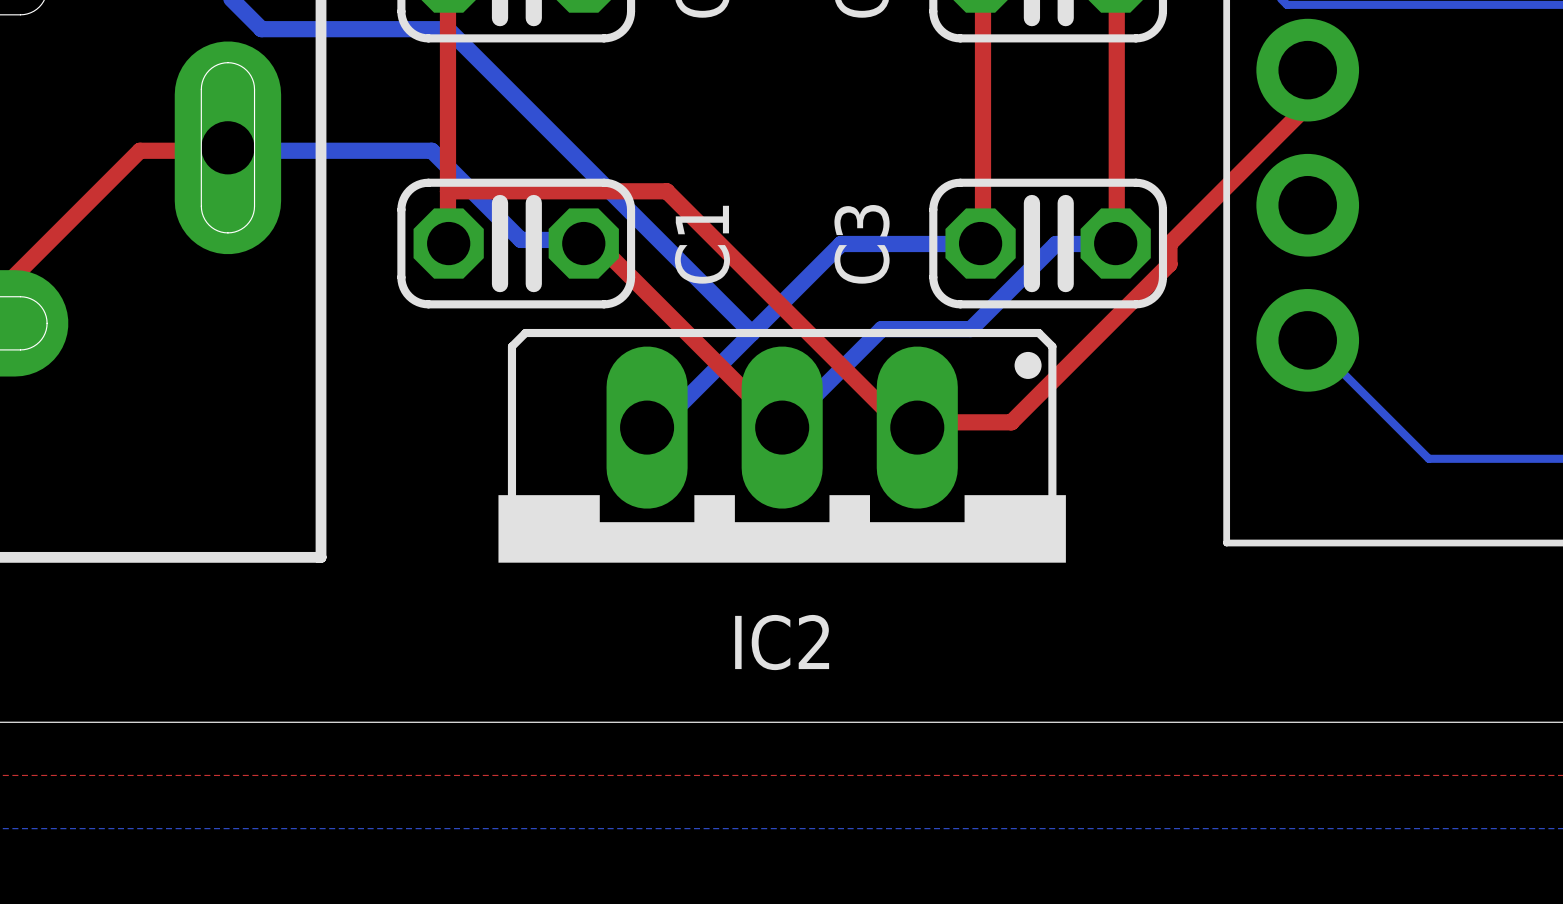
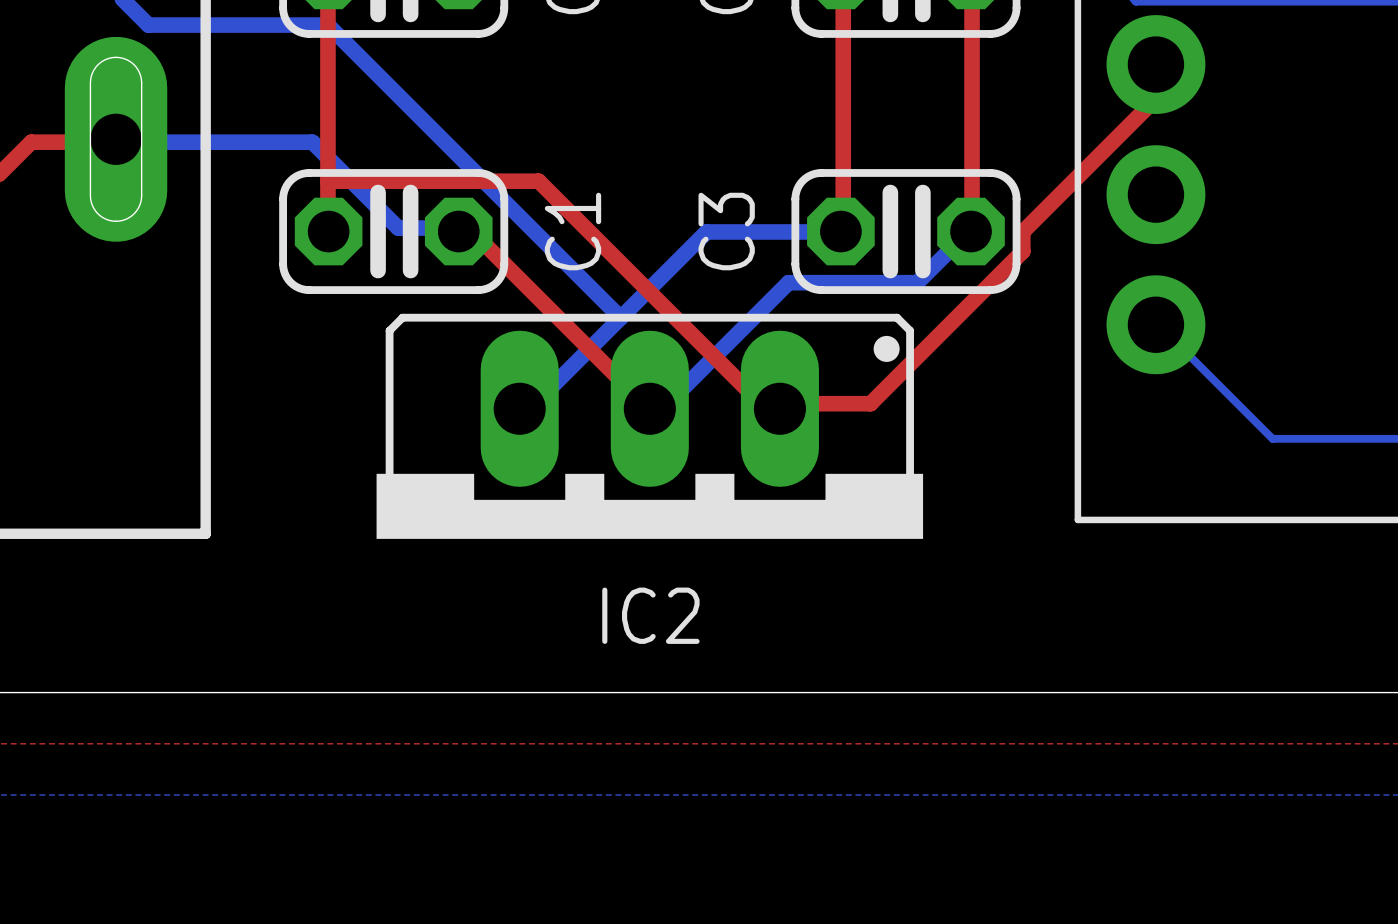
bottom track: (1112, 243) (1055, 243) (970, 329) (881, 329) (784, 426) -> (968, 231) (917, 282) (788, 282) (663, 407) (651, 407)

